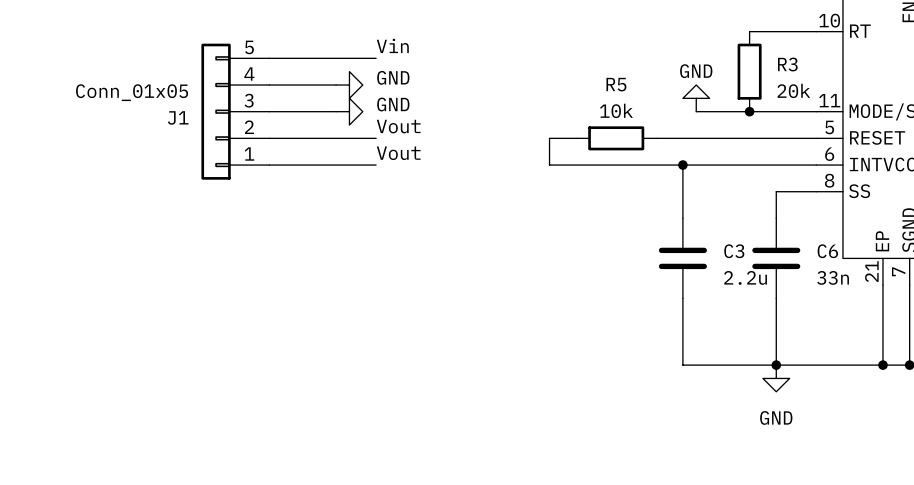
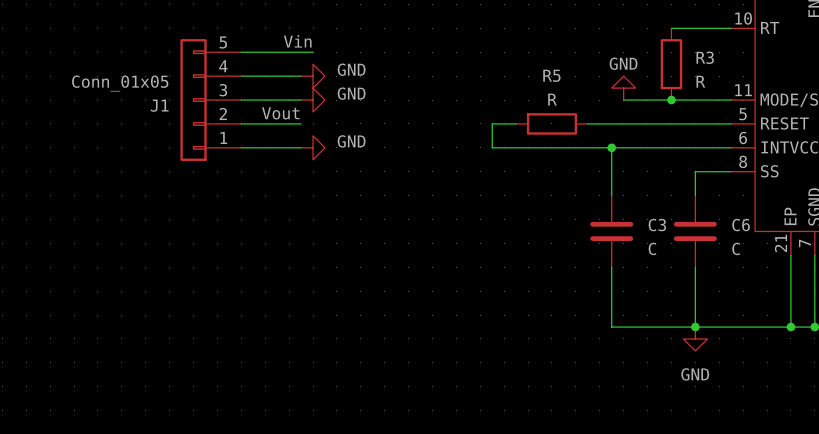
label position: Vin (392, 45) -> Vin (297, 41)
wire: (349, 58) (376, 58) -> none
R3 value: 20k (793, 90) -> R (700, 81)
R5 value: 10k (616, 110) -> R (552, 99)
label: none -> Vout (280, 113)
label: Vout (398, 126) -> none
wire: (336, 138) (376, 138) -> none
label: Vout (398, 153) -> none
wire: (336, 165) (376, 165) -> none
power symbol: none -> GND (313, 147)
C3 value: 2.2u (745, 277) -> C (652, 248)
C6 value: 33n (833, 277) -> C (736, 248)

